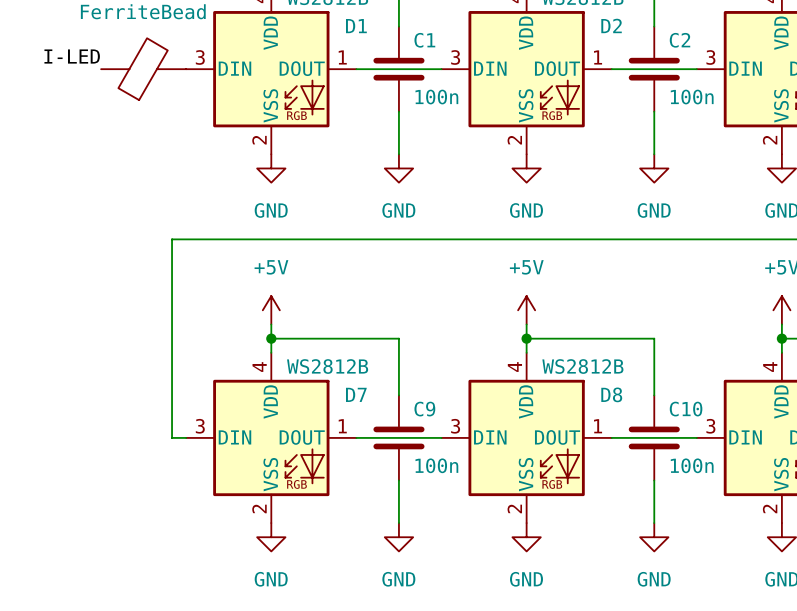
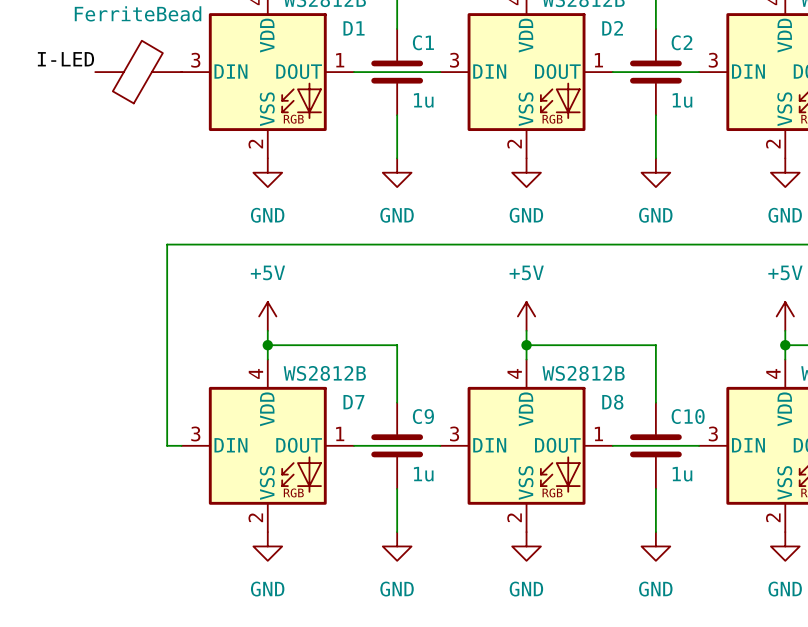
C1 value: 100n (436, 97) -> 1u (423, 100)
C2 value: 100n (692, 97) -> 1u (682, 100)
C9 value: 100n (436, 465) -> 1u (423, 474)
C10 value: 100n (692, 465) -> 1u (682, 474)

